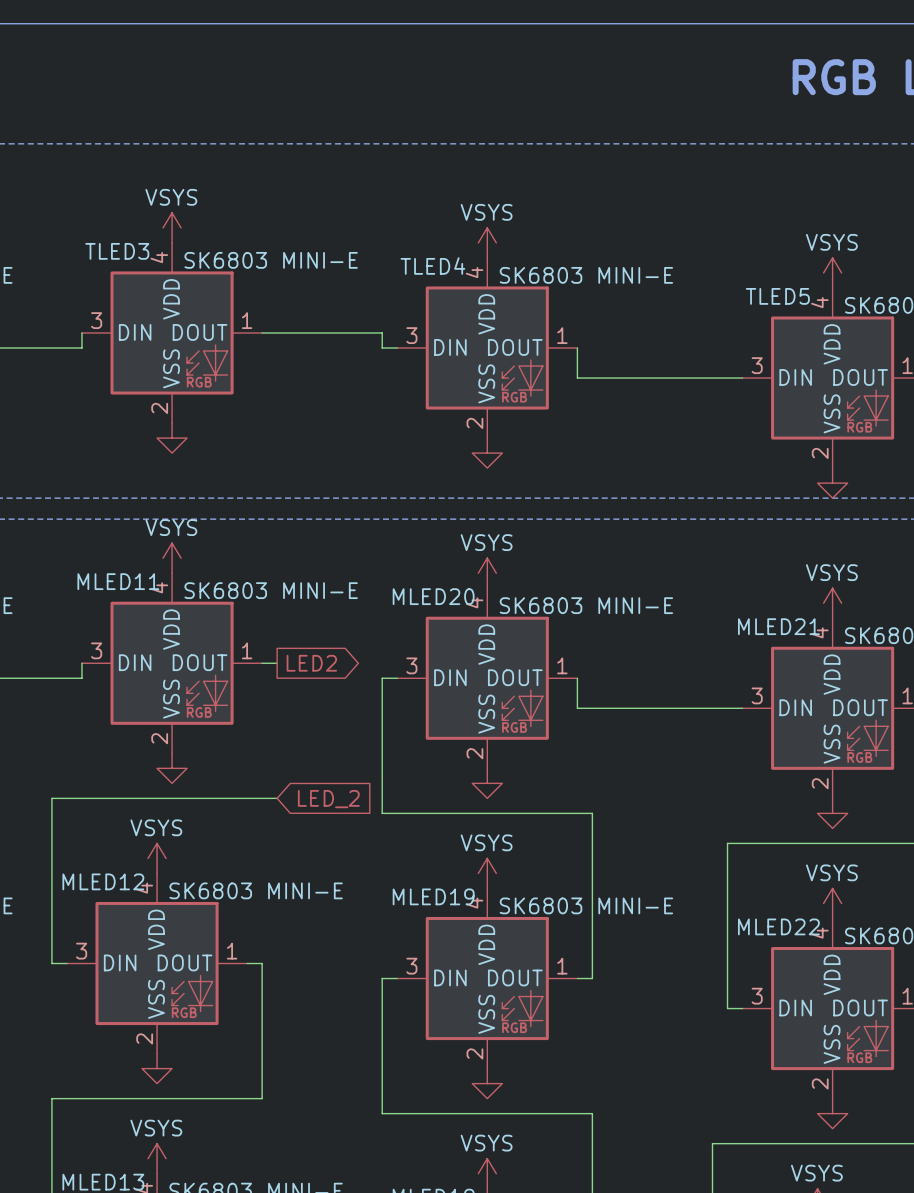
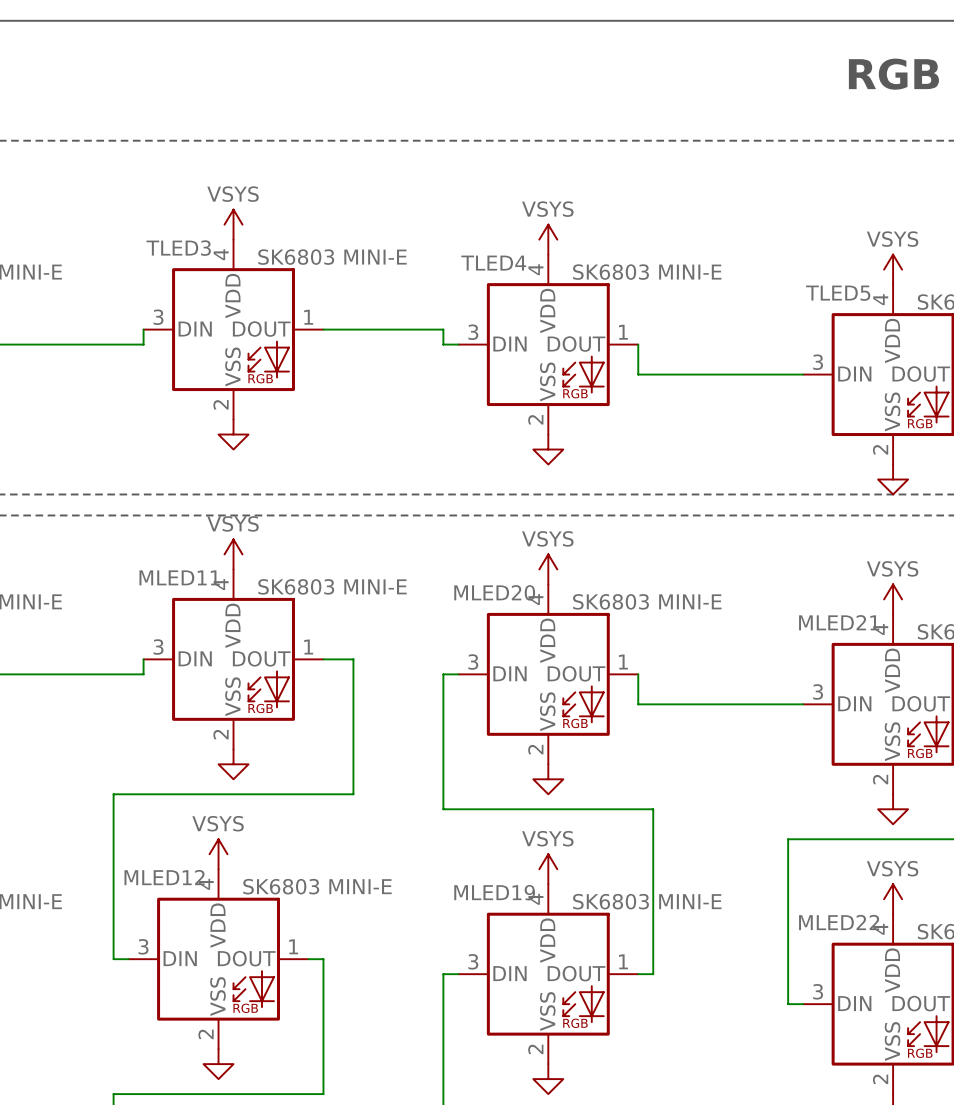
wire: none -> (338, 659) (353, 659) (353, 794) (338, 794)
global label: LED2 (311, 663) -> none
global label: LED_2 (328, 799) -> none

